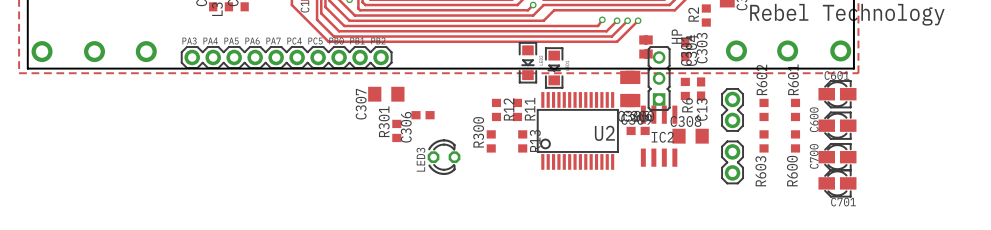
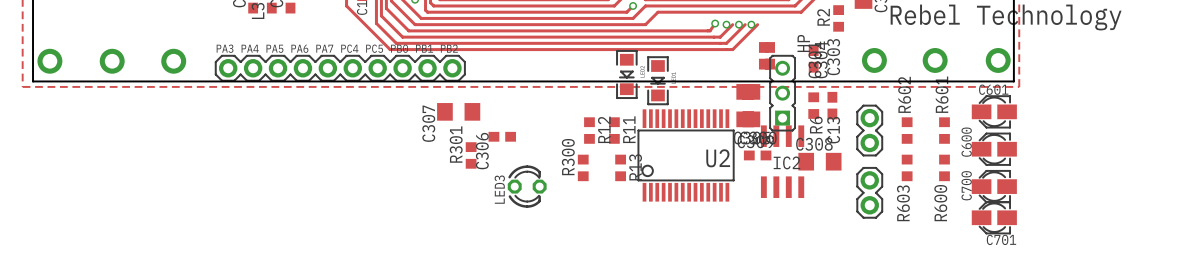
via: none -> (726, 24)
via: (617, 20) -> none
via: none -> (738, 24)
via: (627, 20) -> none
via: none -> (751, 24)
via: (638, 20) -> none

